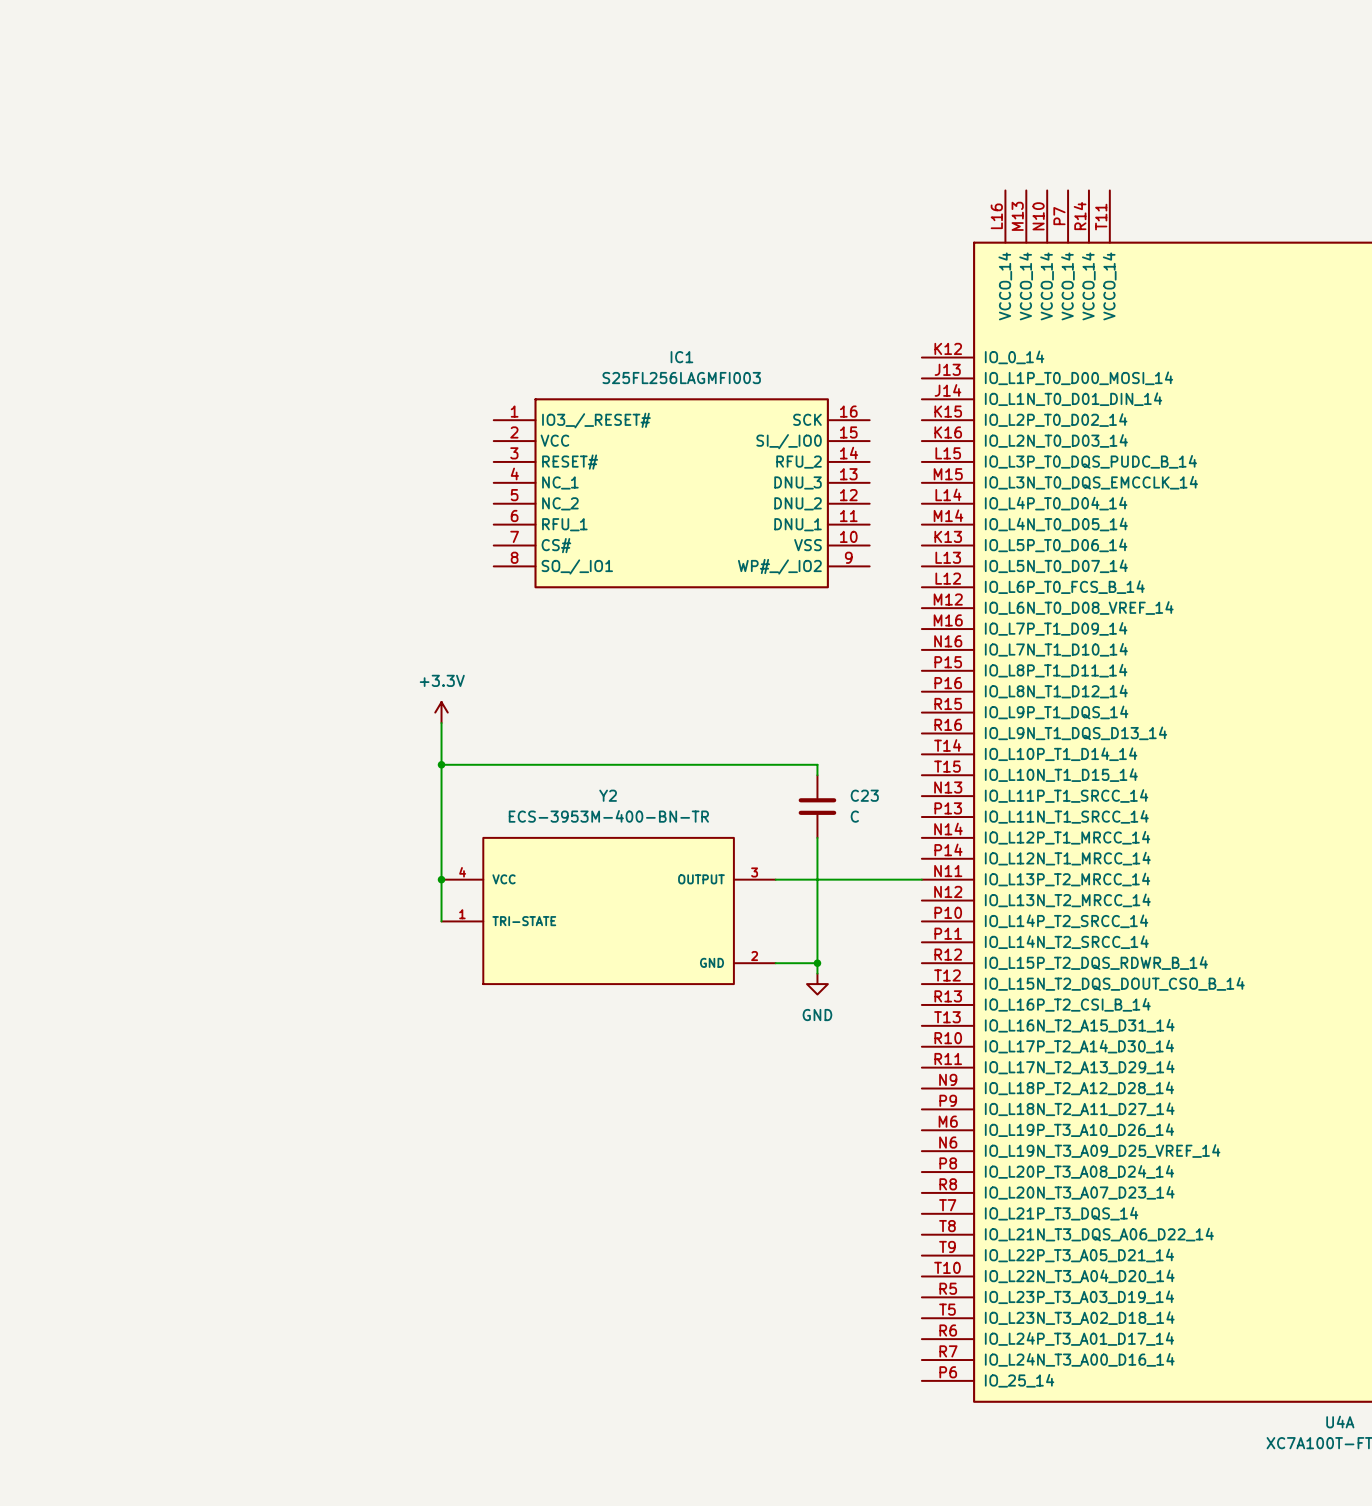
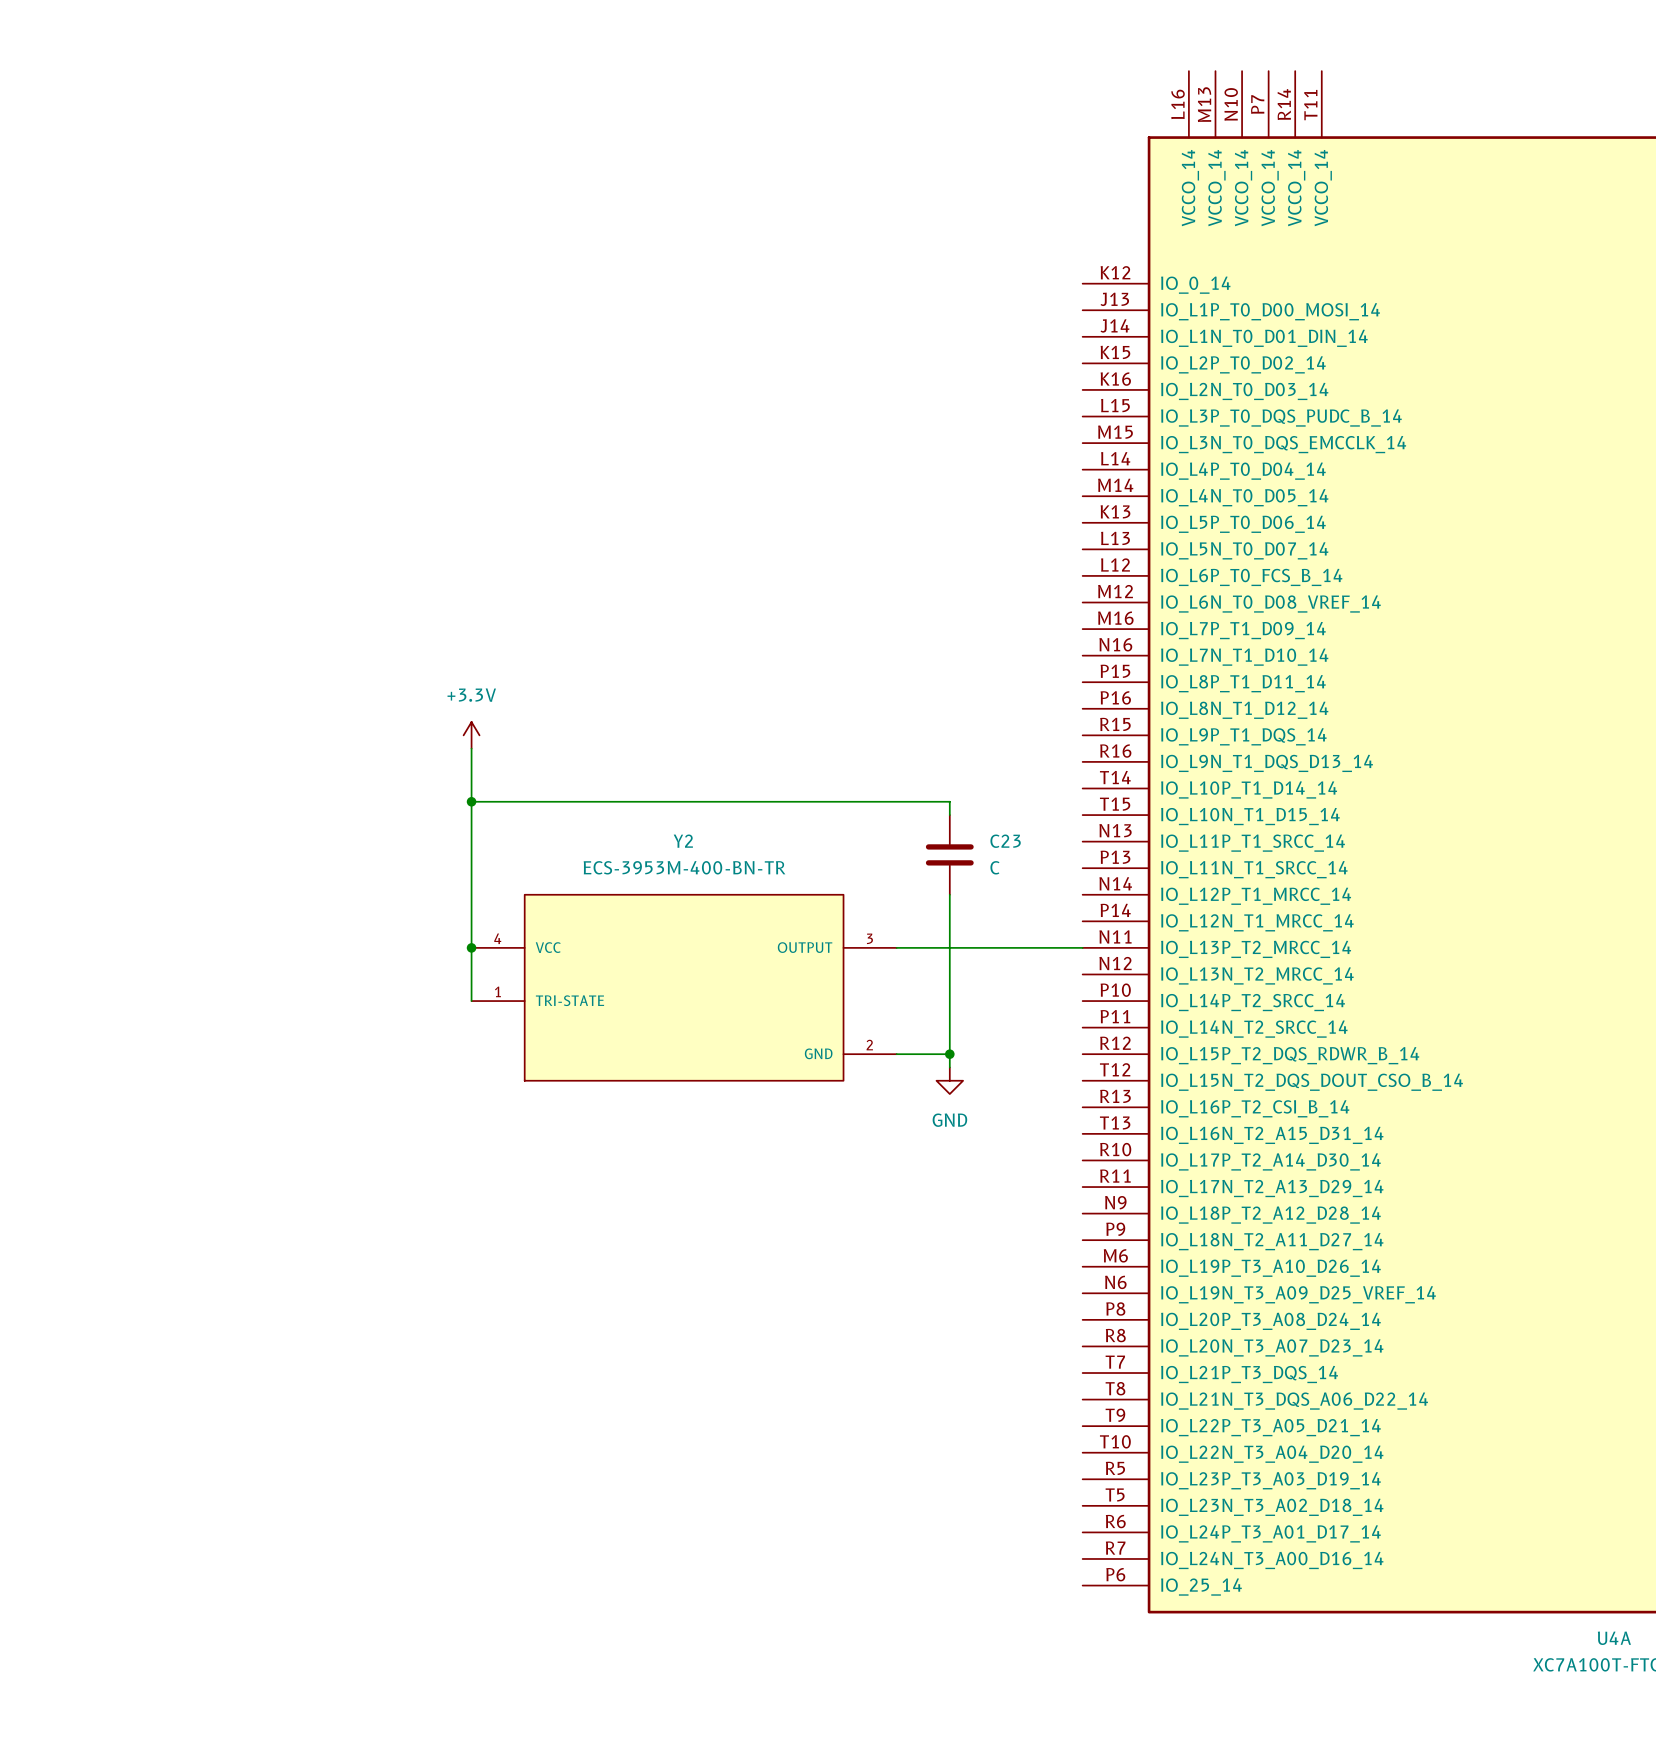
IC1: S25FL256LAGMFI003 (681, 493) -> none

